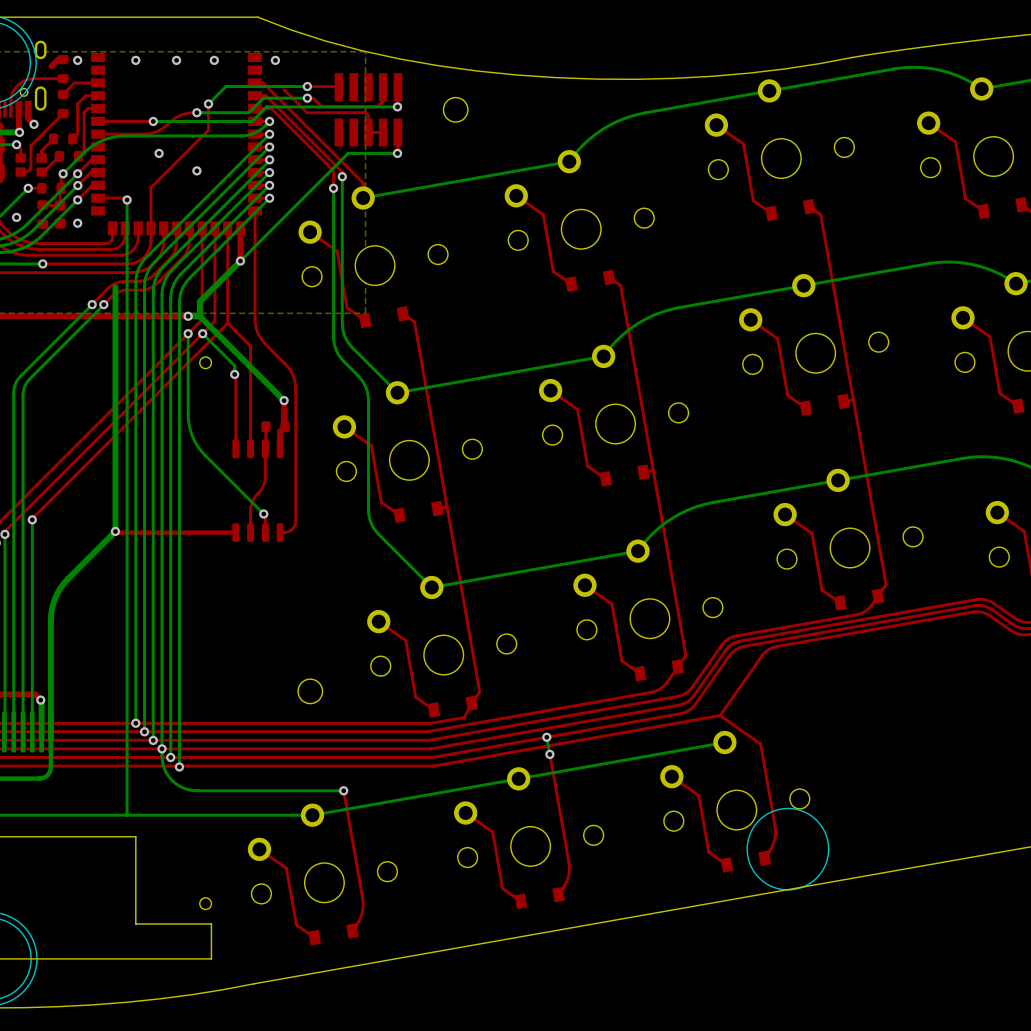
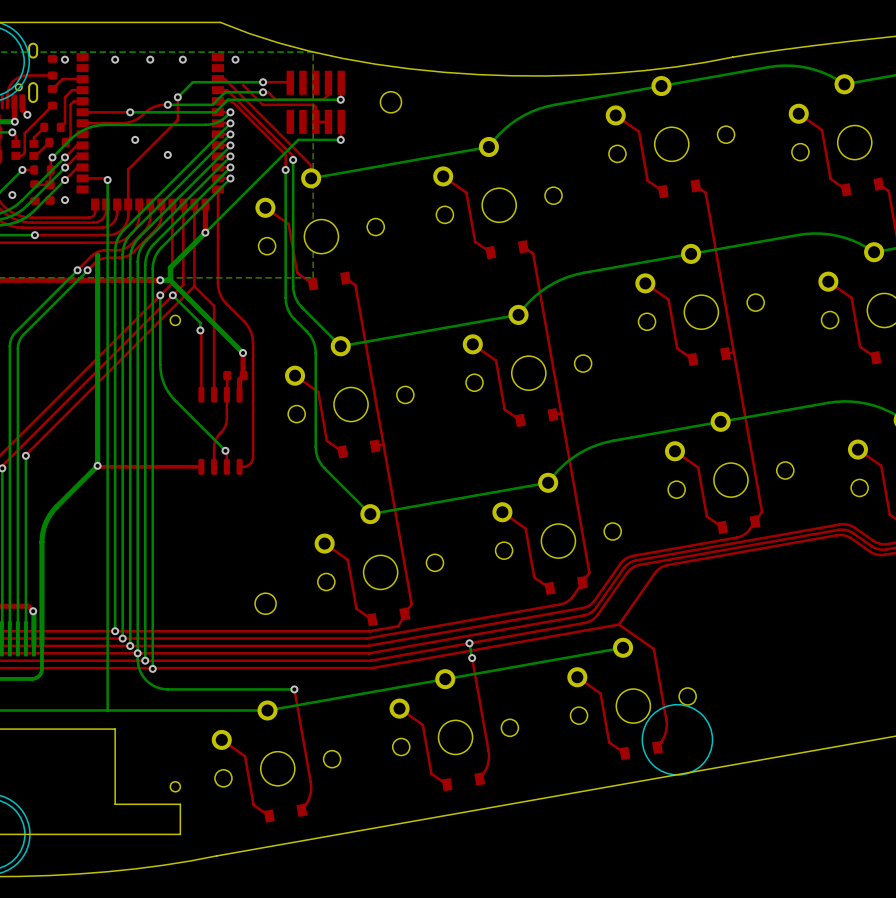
top track: (63, 59) (58, 59) (51, 66) -> none

